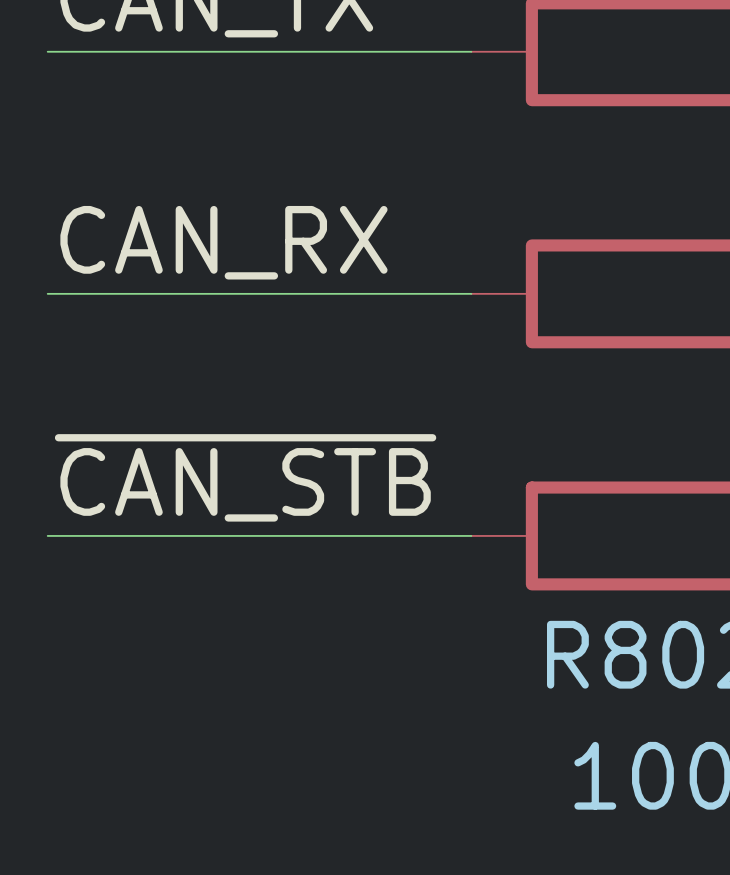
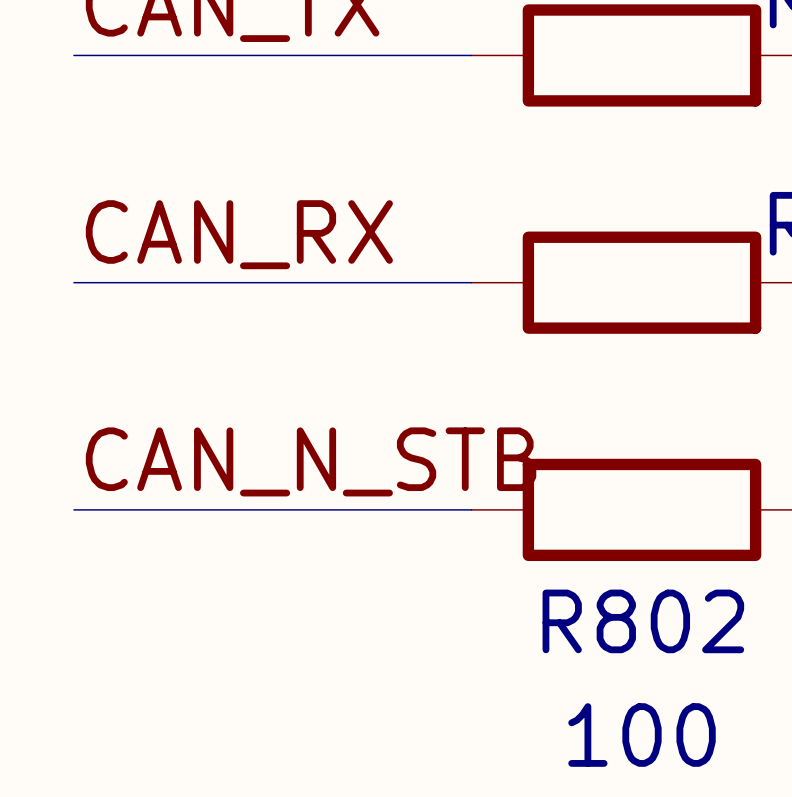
label: ~{CAN_STB} (245, 477) -> CAN_N_STB (311, 461)

